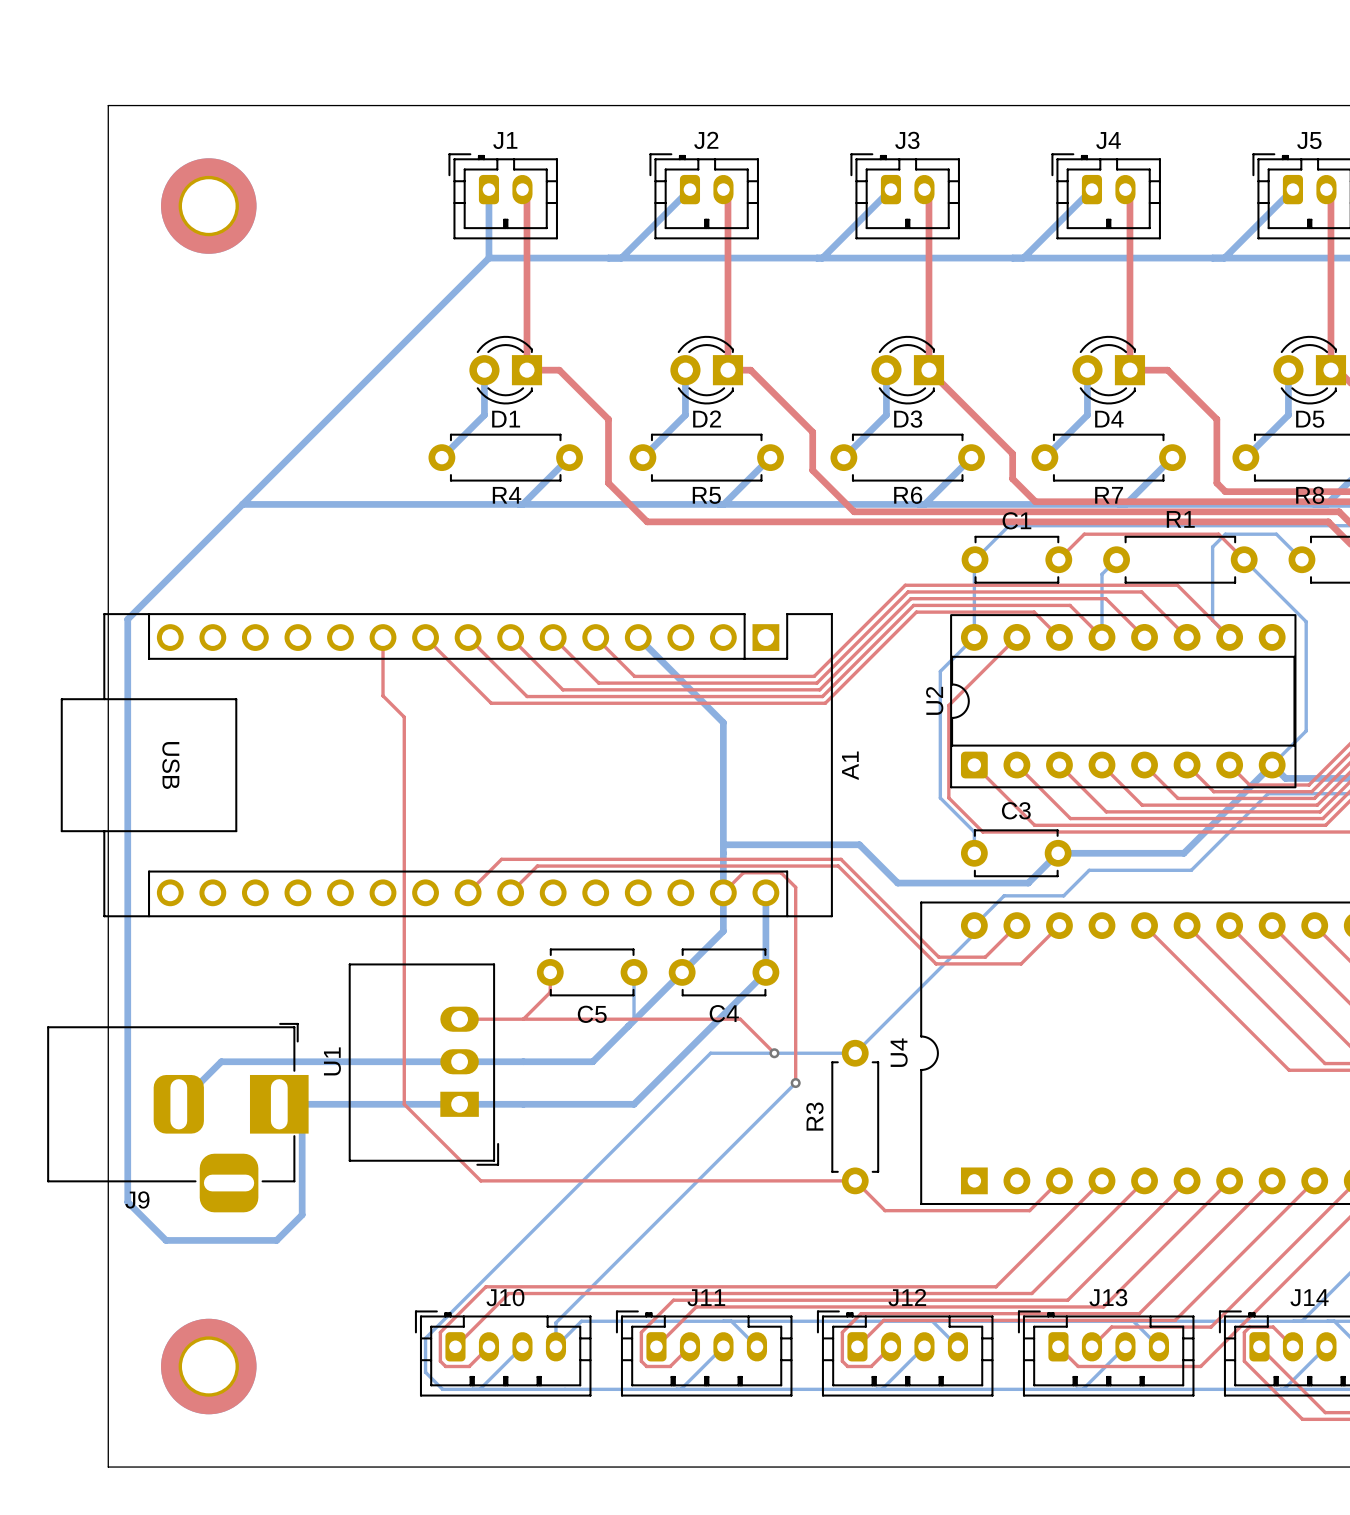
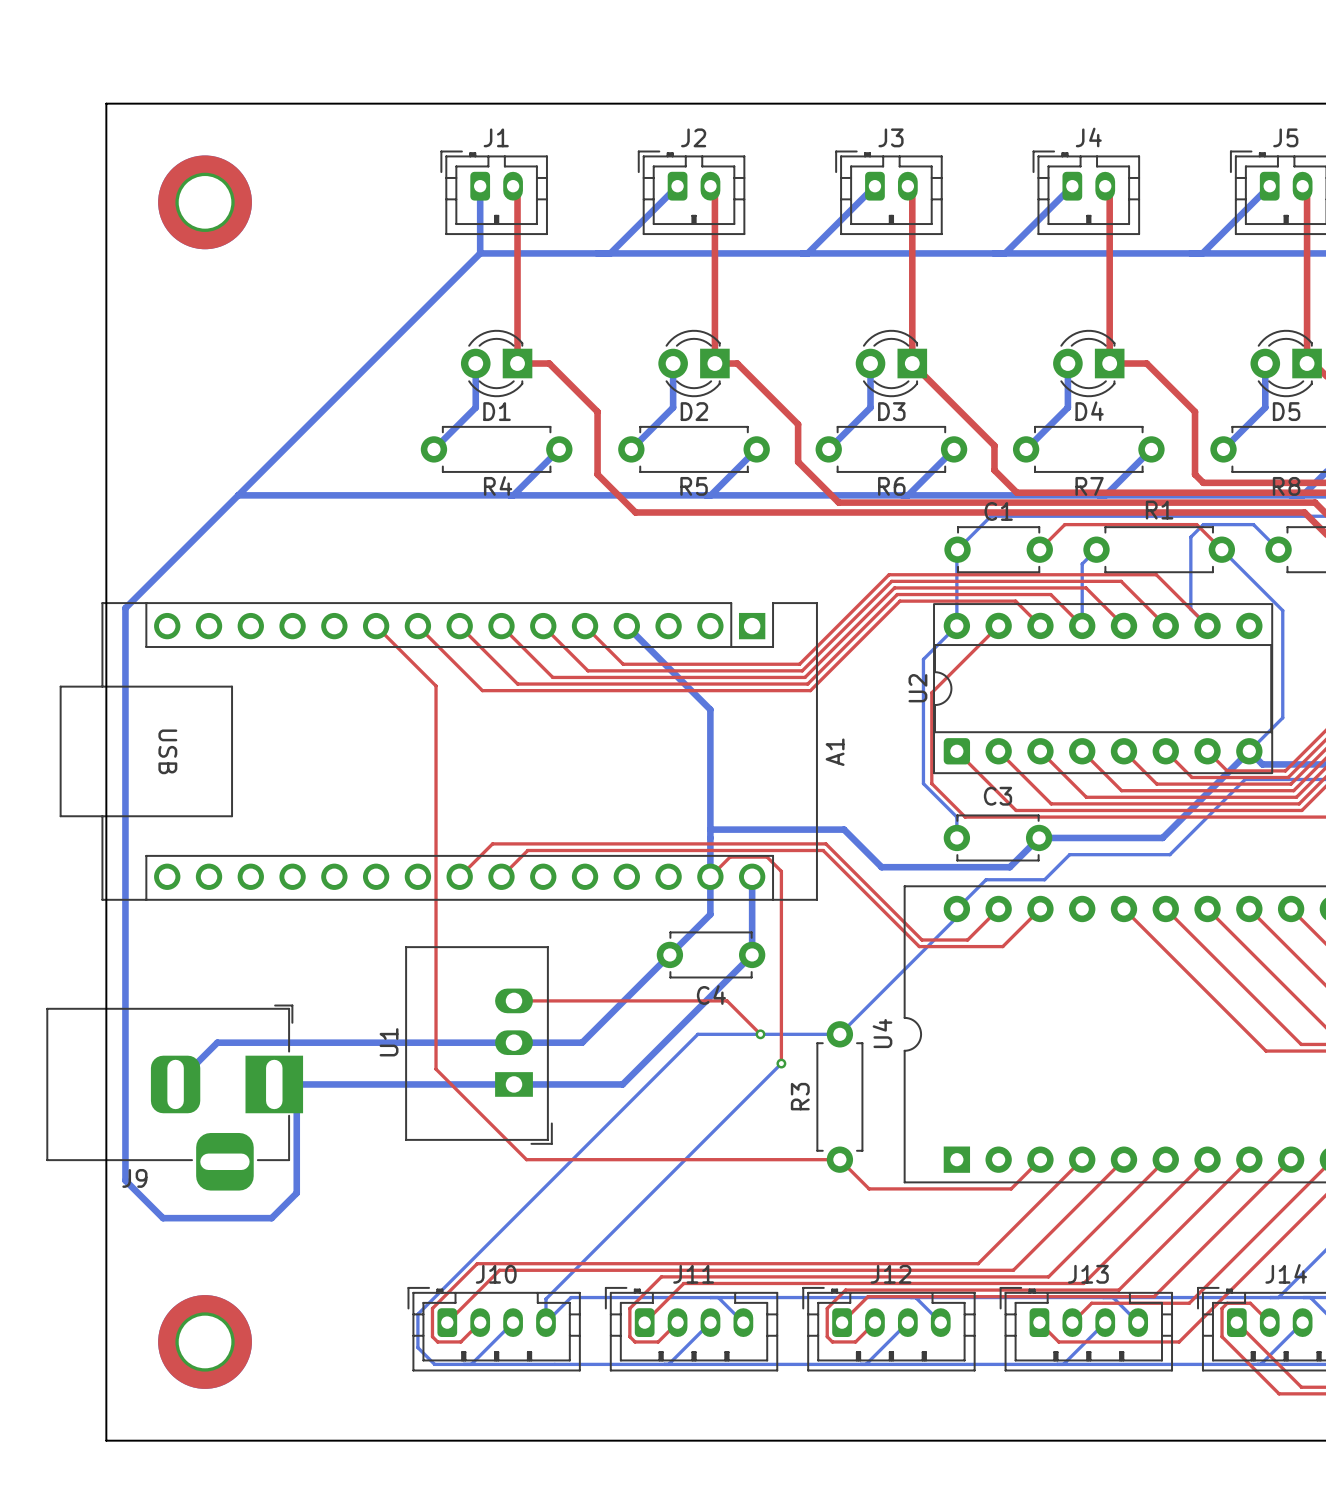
top track: (383, 637) (383, 695) (404, 717) (404, 1104) (480, 1180) (536, 1180) -> (376, 626) (436, 685) (436, 1069) (526, 1159)
top track: (550, 972) (550, 992) (523, 1019) (459, 1019) -> none
C5: (592, 972) -> none
bottom track: (634, 972) (634, 1020) (628, 1026) -> none
U1 position: (423, 1064) -> (478, 1045)

